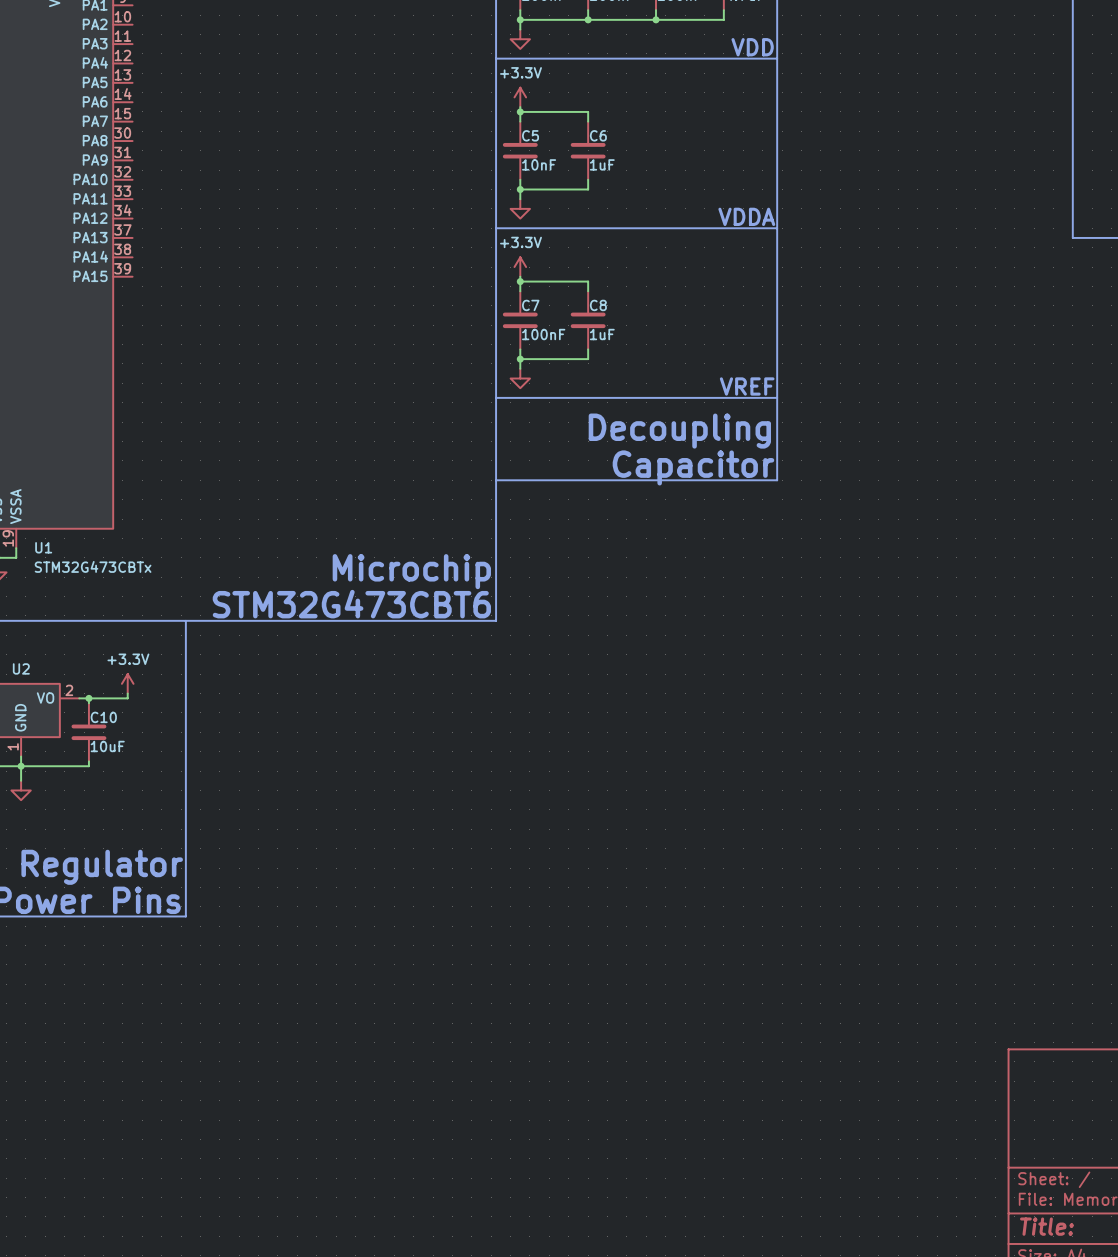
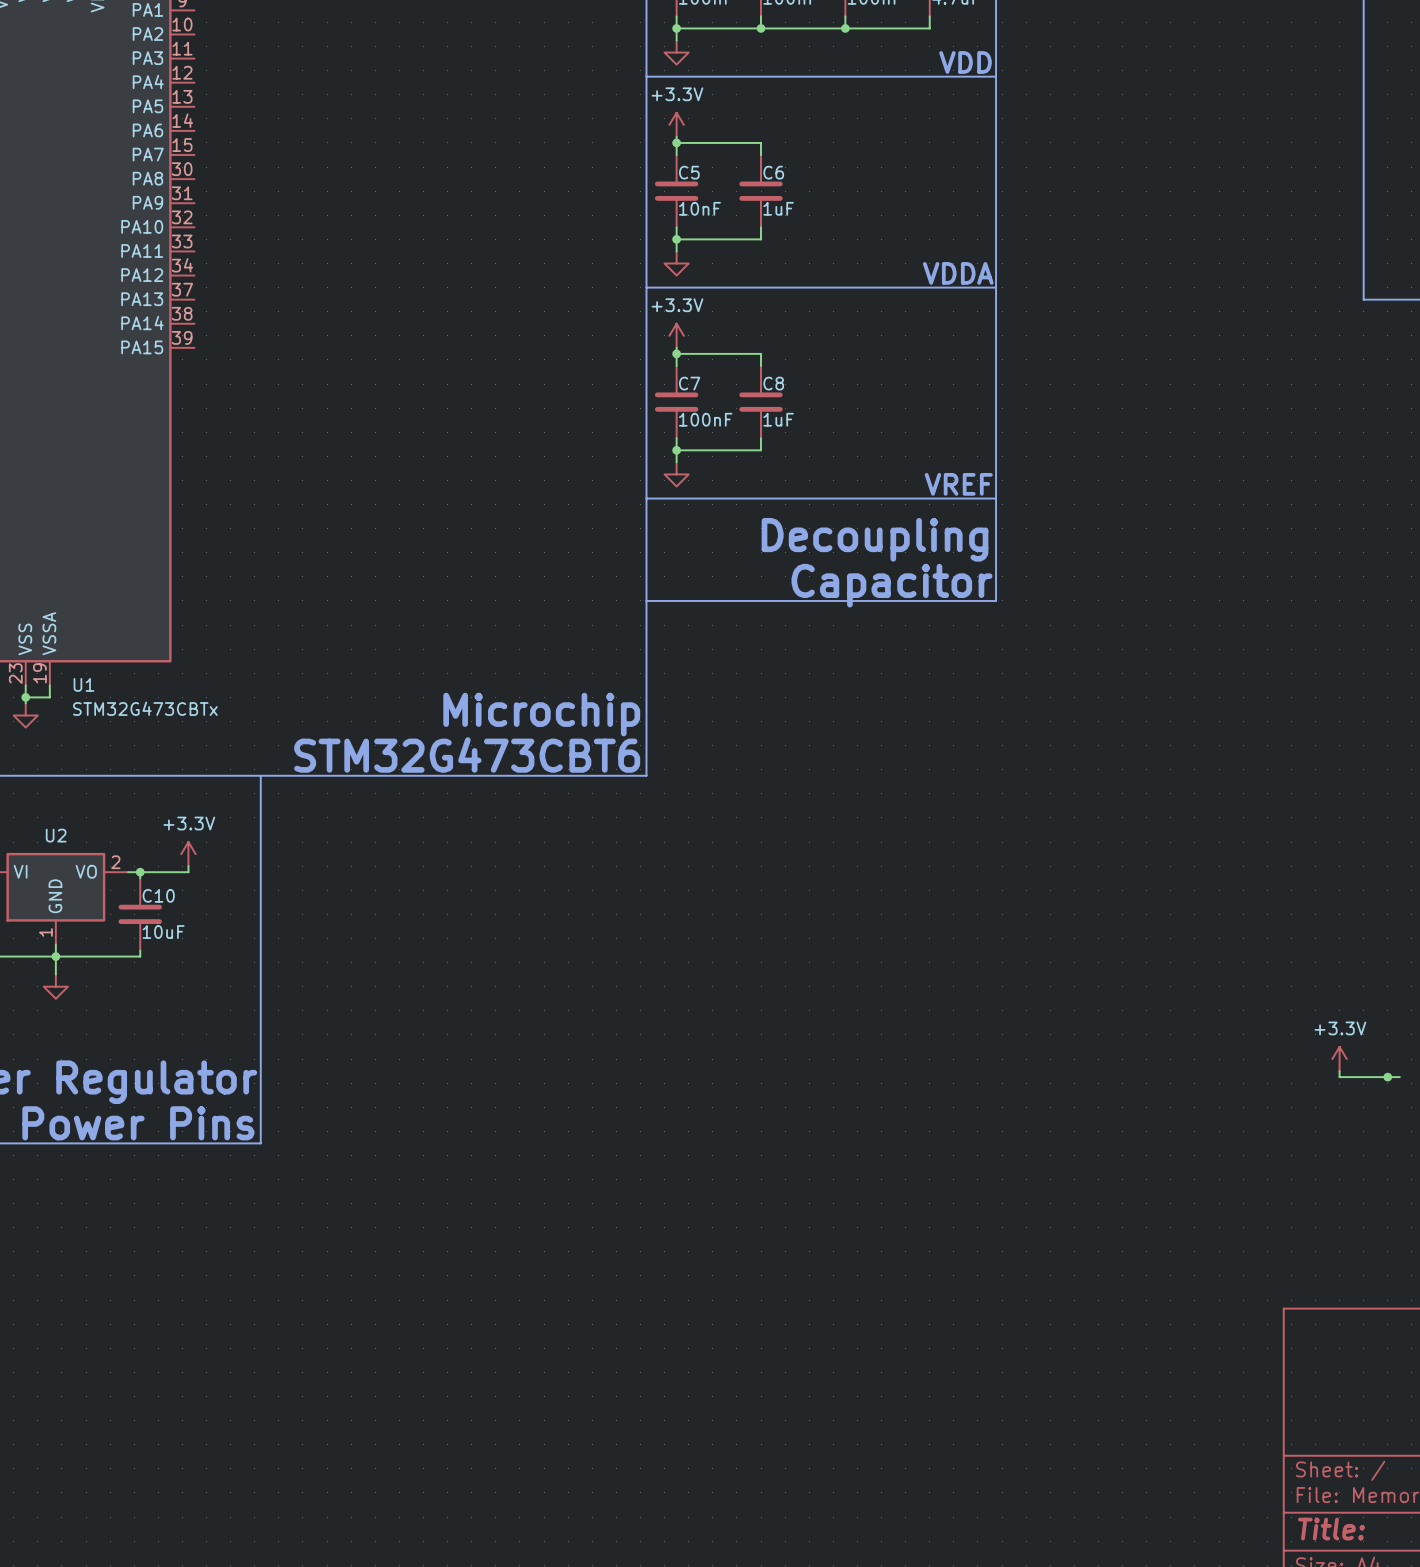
power symbol: none -> +3.3V (1339, 1059)
wire: none -> (1339, 1071) (1339, 1077) (1399, 1077)
junction: none -> (1387, 1077)

